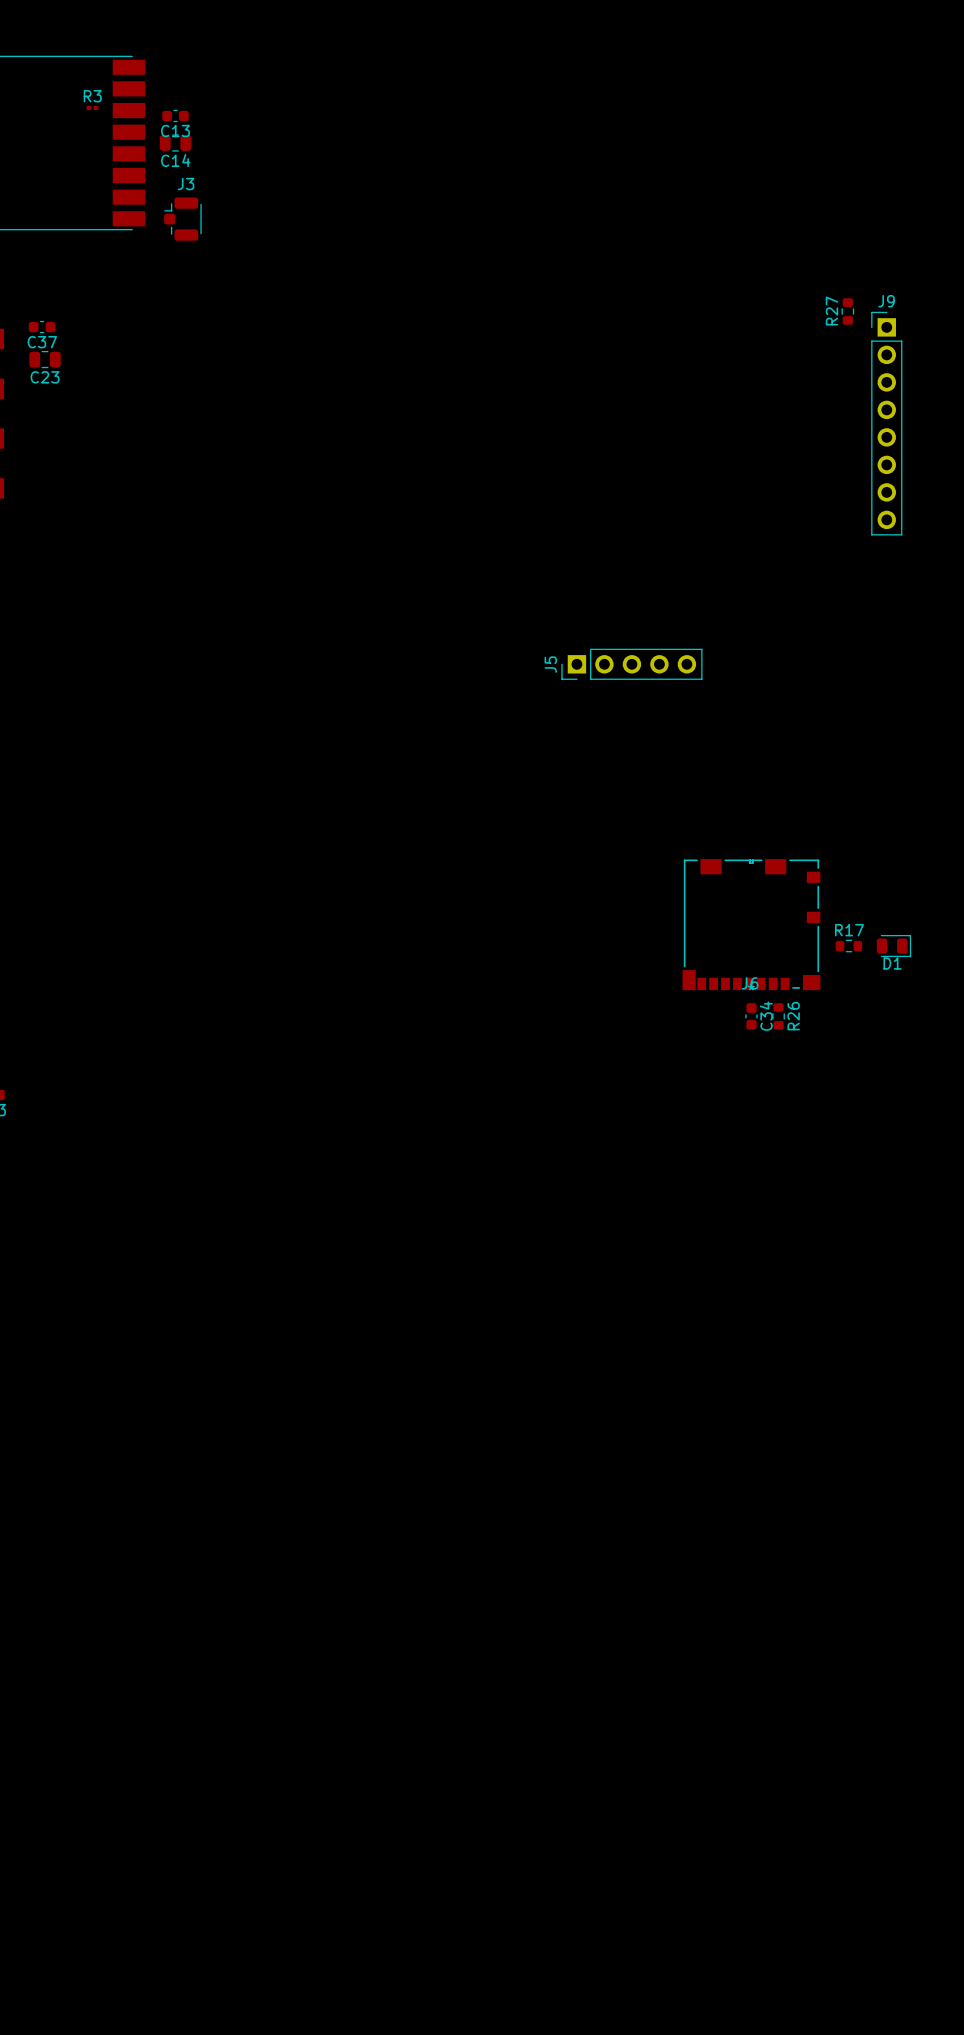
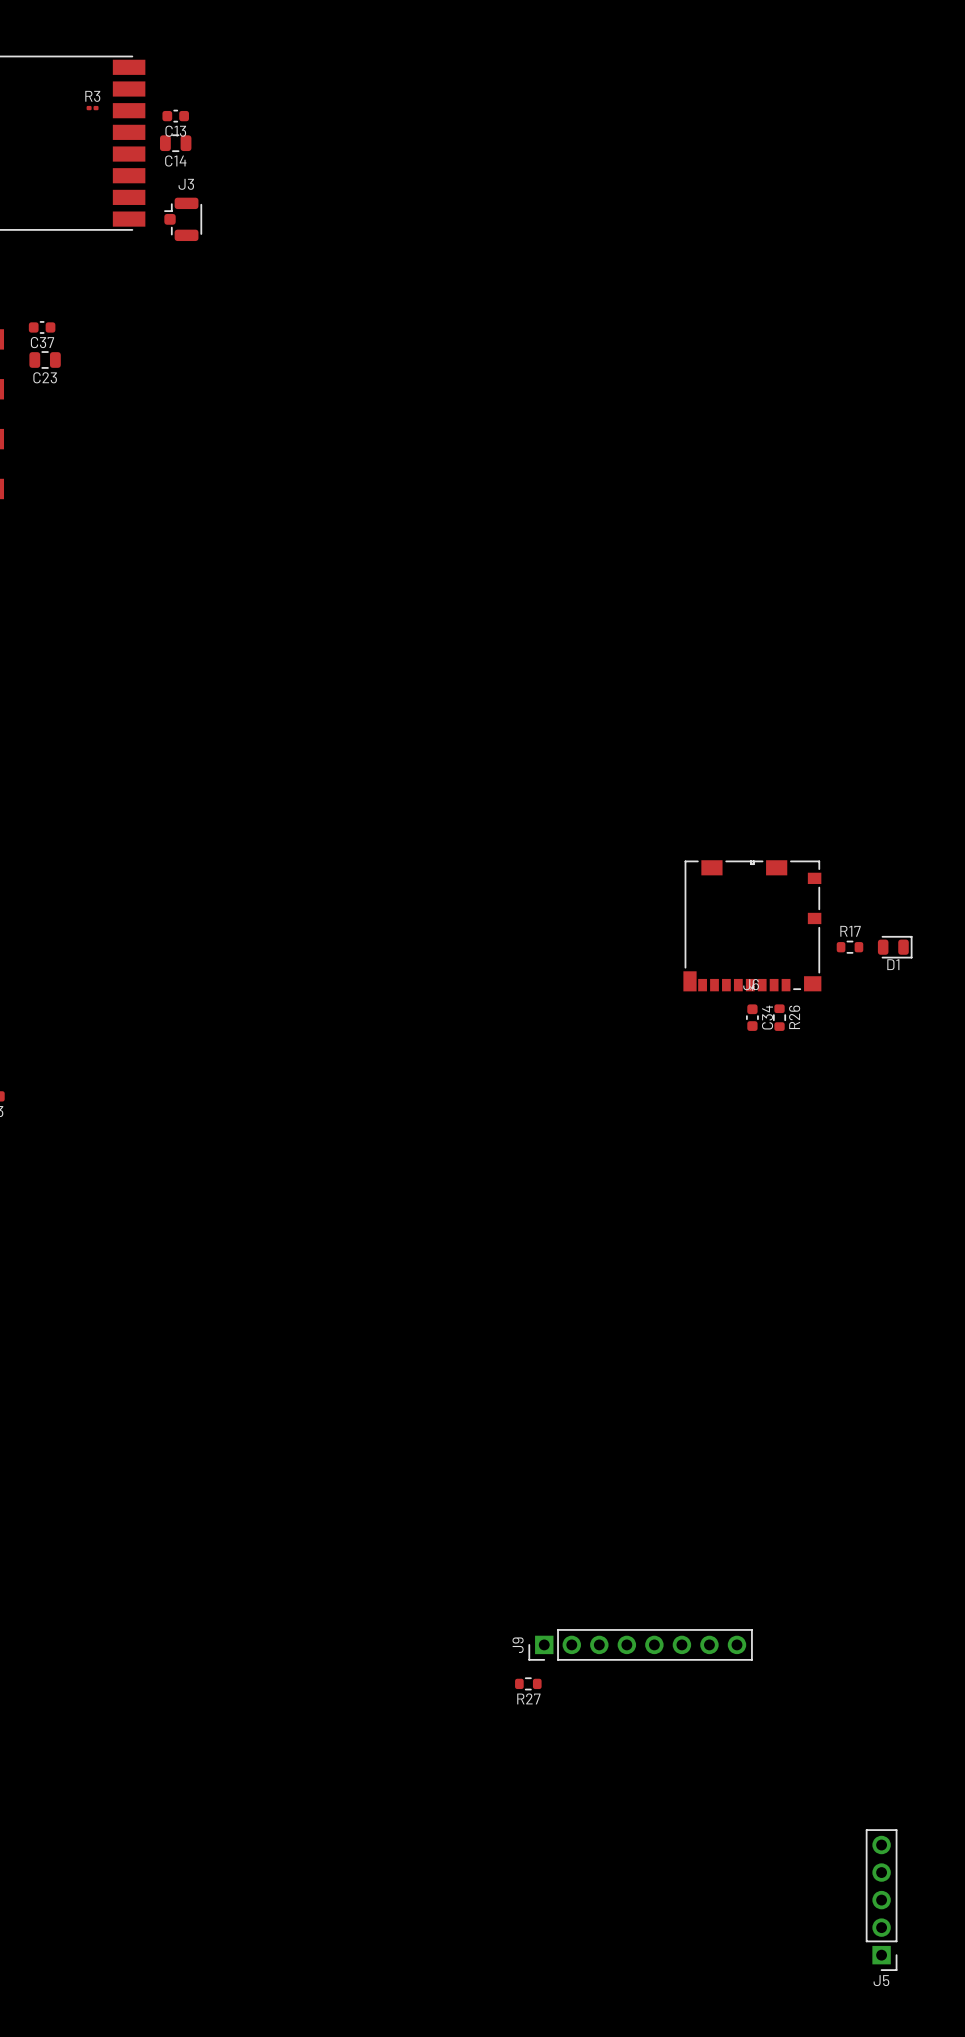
R27 name position: R27 (831, 310) -> R27 (528, 1698)
R27 rotation: 0° (847, 311) -> 90° clockwise (528, 1683)
R27 position: (847, 311) -> (528, 1683)
J9 rotation: 0° (886, 423) -> 90° counterclockwise (640, 1644)
J9 position: (886, 423) -> (640, 1644)
J5 rotation: 0° (631, 664) -> 90° counterclockwise (881, 1900)
J5 position: (631, 664) -> (881, 1900)

